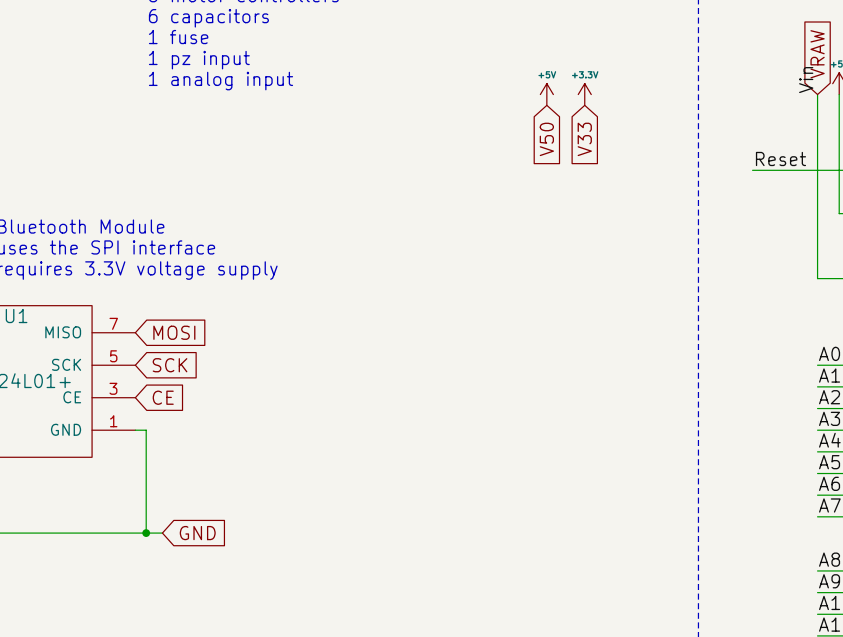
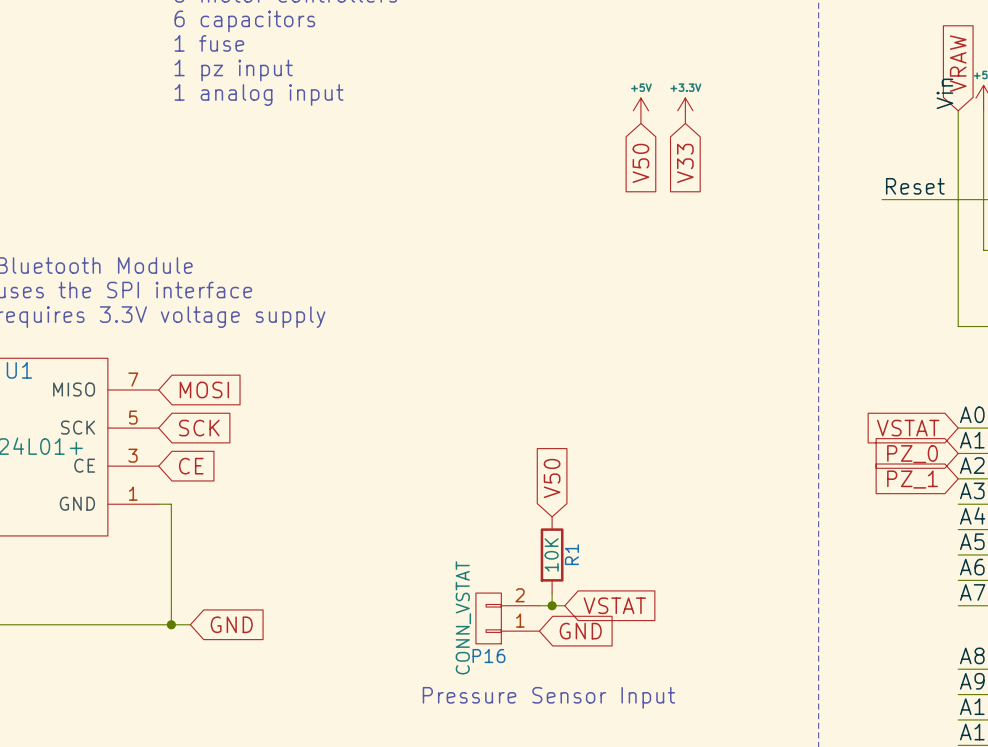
global label: none -> VSTAT (908, 428)
global label: none -> PZ_0 (912, 454)
global label: none -> V50 (552, 478)
global label: none -> PZ_1 (912, 479)
R1: none -> 10K (552, 554)
wire: none -> (552, 593) (552, 605)
wire: none -> (539, 605) (564, 605)
junction: none -> (552, 605)
global label: none -> VSTAT (614, 605)
P16: none -> CONN_VSTAT (507, 618)
global label: none -> GND (580, 631)
text: none -> Pressure Sensor Input (548, 697)

